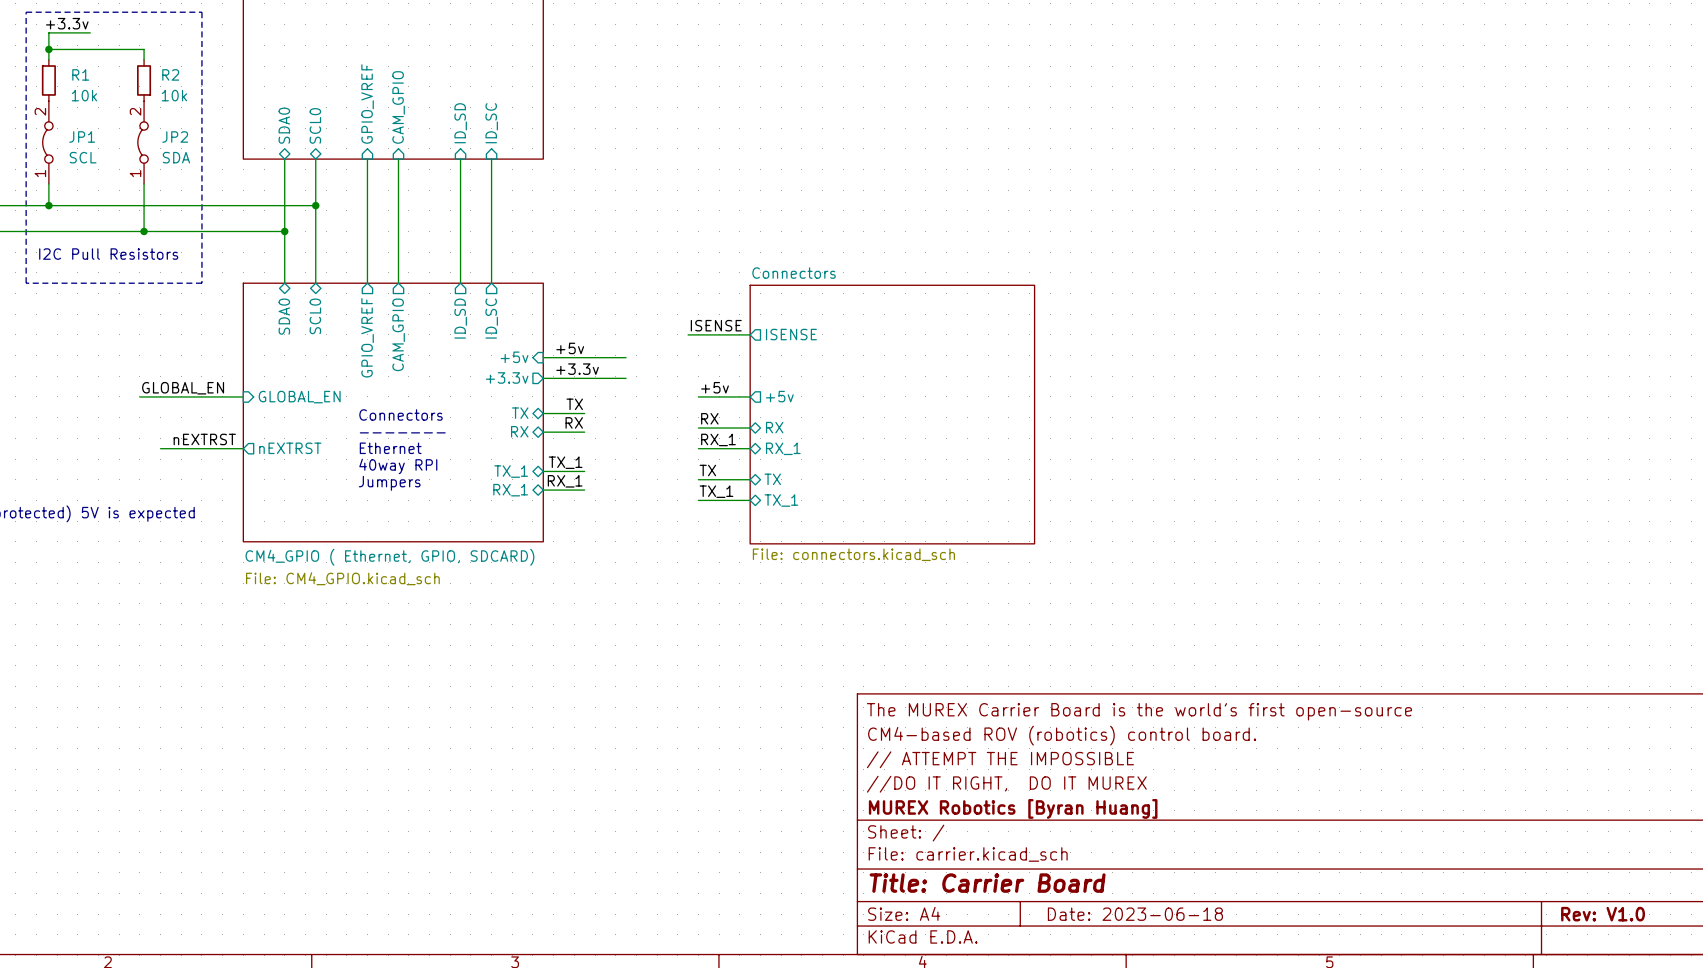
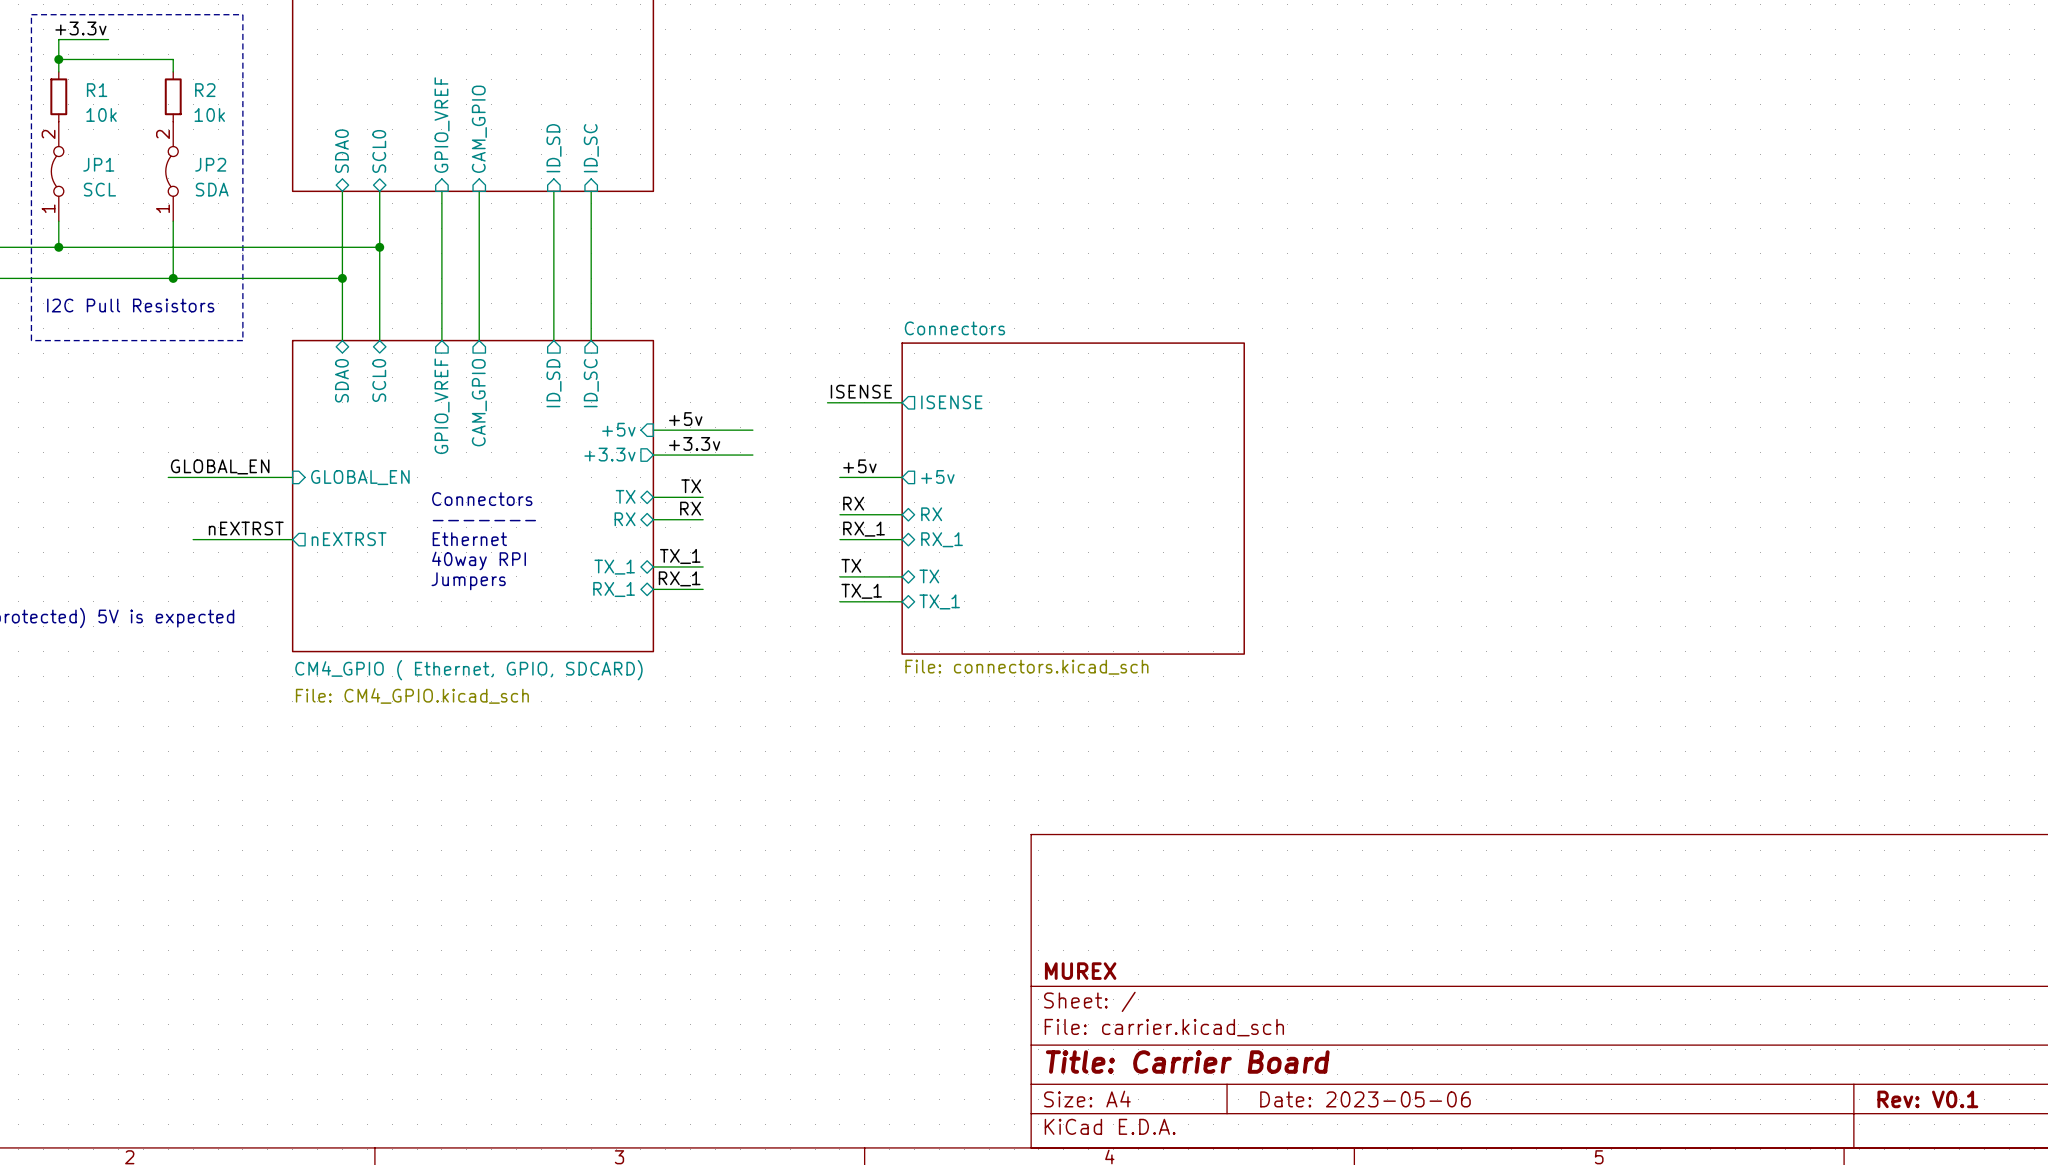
title block: The MUREX Carrier Board is the world's first open-source (1139, 711) -> none
title block: CM4-based ROV (robotics) control board. (1062, 735) -> none
title block: // ATTEMPT THE IMPOSSIBLE (1000, 759) -> none
title block: //DO IT RIGHT, DO IT MUREX (1006, 784) -> none
title block: MUREX Robotics [Byran Huang] (1013, 808) -> MUREX (1080, 971)
title block: Date: 2023-06-18 (1135, 914) -> Date: 2023-05-06 (1365, 1099)
title block: Rev: V1.0 (1603, 914) -> Rev: V0.1 (1927, 1099)

